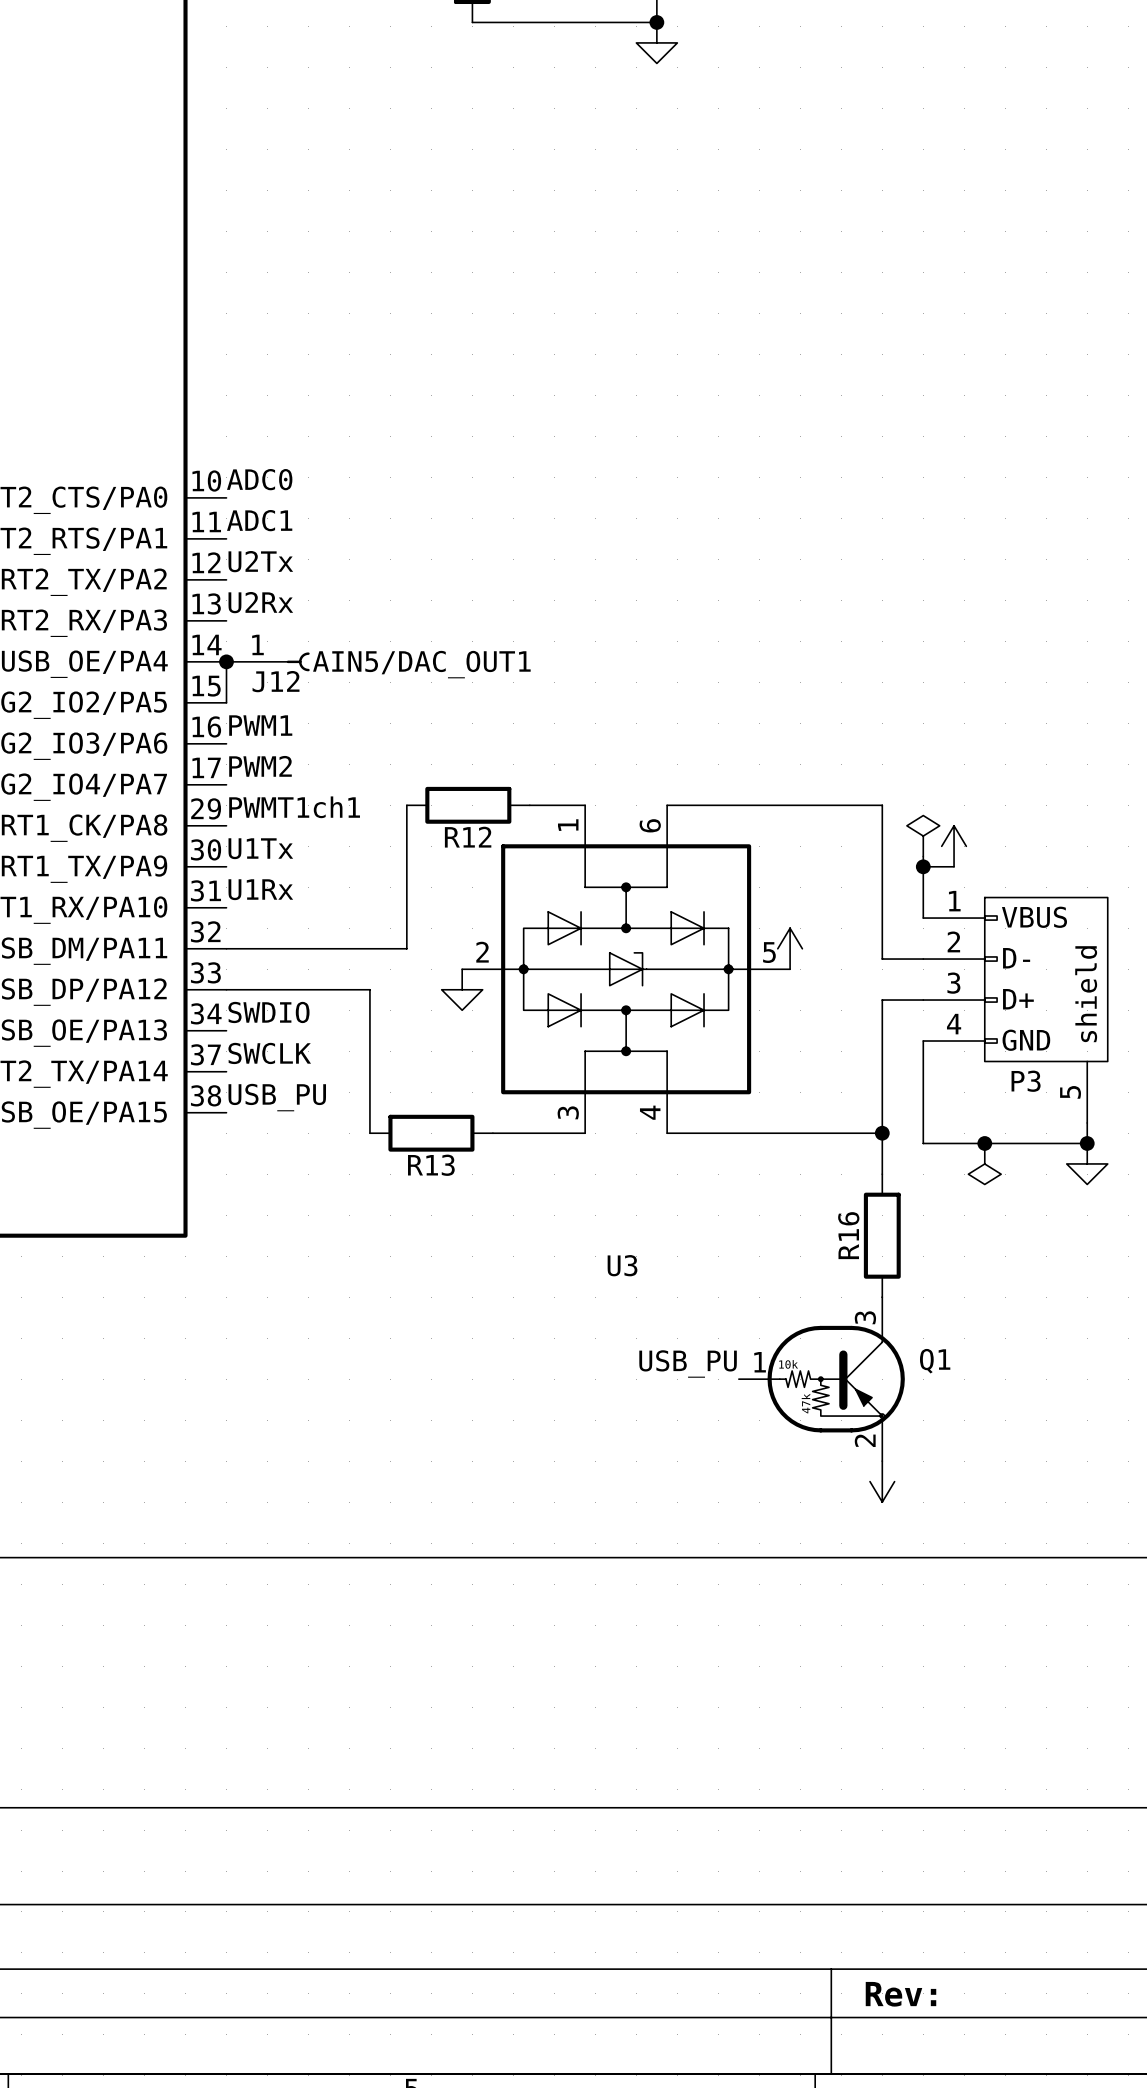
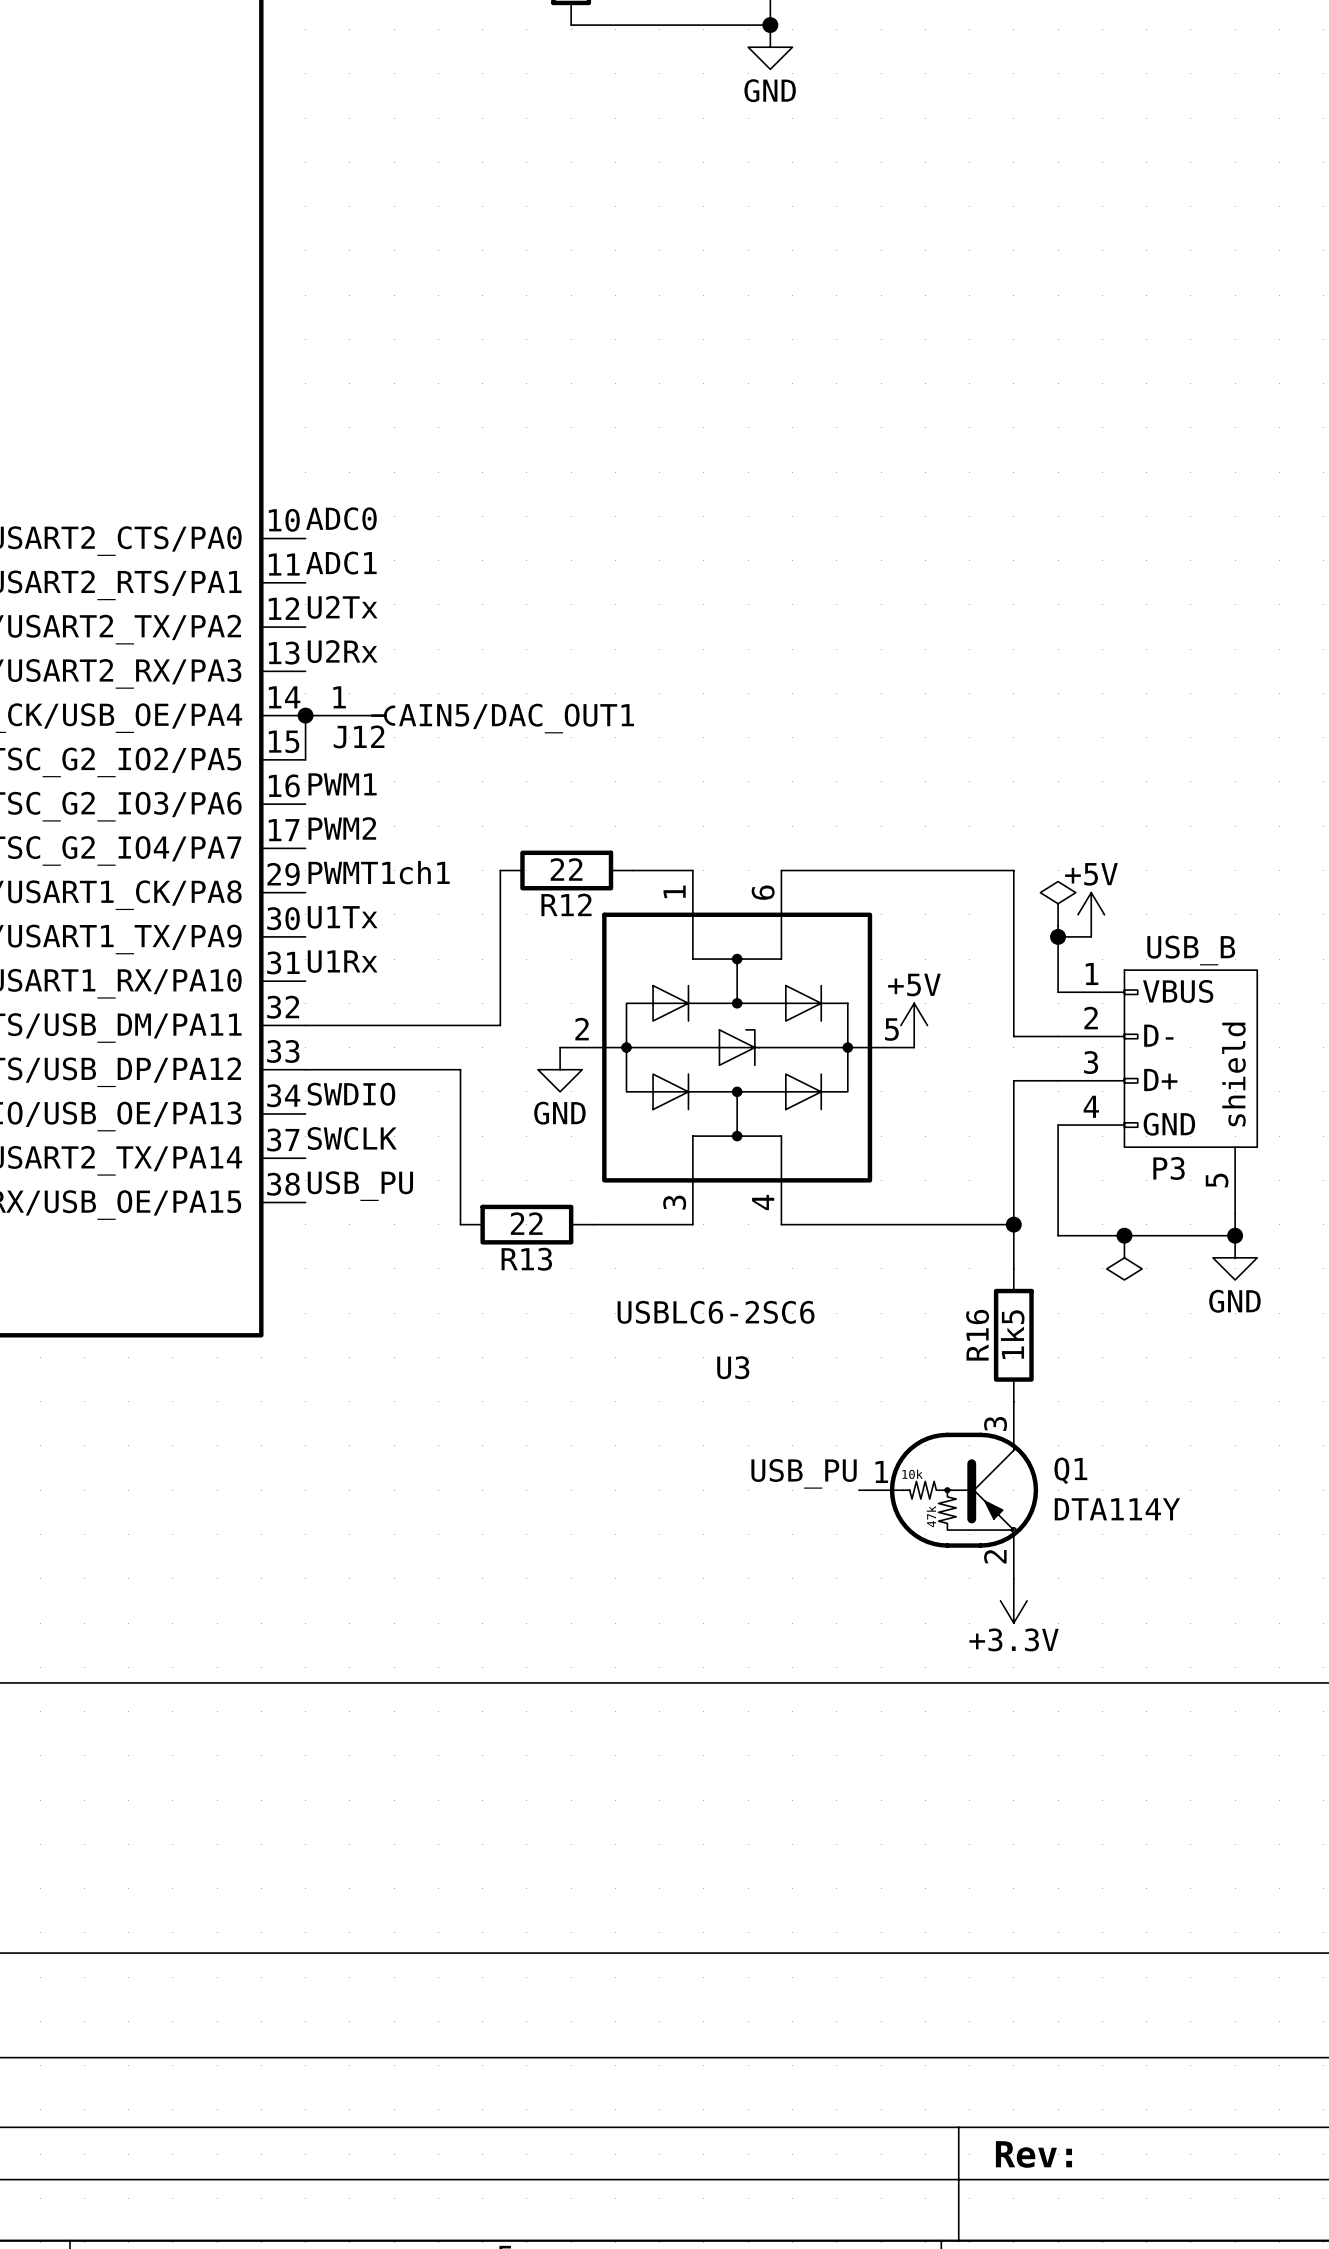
power symbol text: none -> GND (770, 90)
R12 value: none -> 22 (566, 869)
power symbol text: none -> +5V (1091, 874)
P3 value: none -> USB_B (1191, 950)
power symbol text: none -> +5V (914, 985)
power symbol text: none -> GND (559, 1113)
R13 value: none -> 22 (526, 1223)
power symbol text: none -> GND (1234, 1301)
U3 value: none -> USBLC6-2SC6 (716, 1312)
R16 value: none -> 1k5 (1012, 1334)
Q1 value: none -> DTA114Y (1117, 1509)
power symbol text: none -> +3.3V (1014, 1639)

